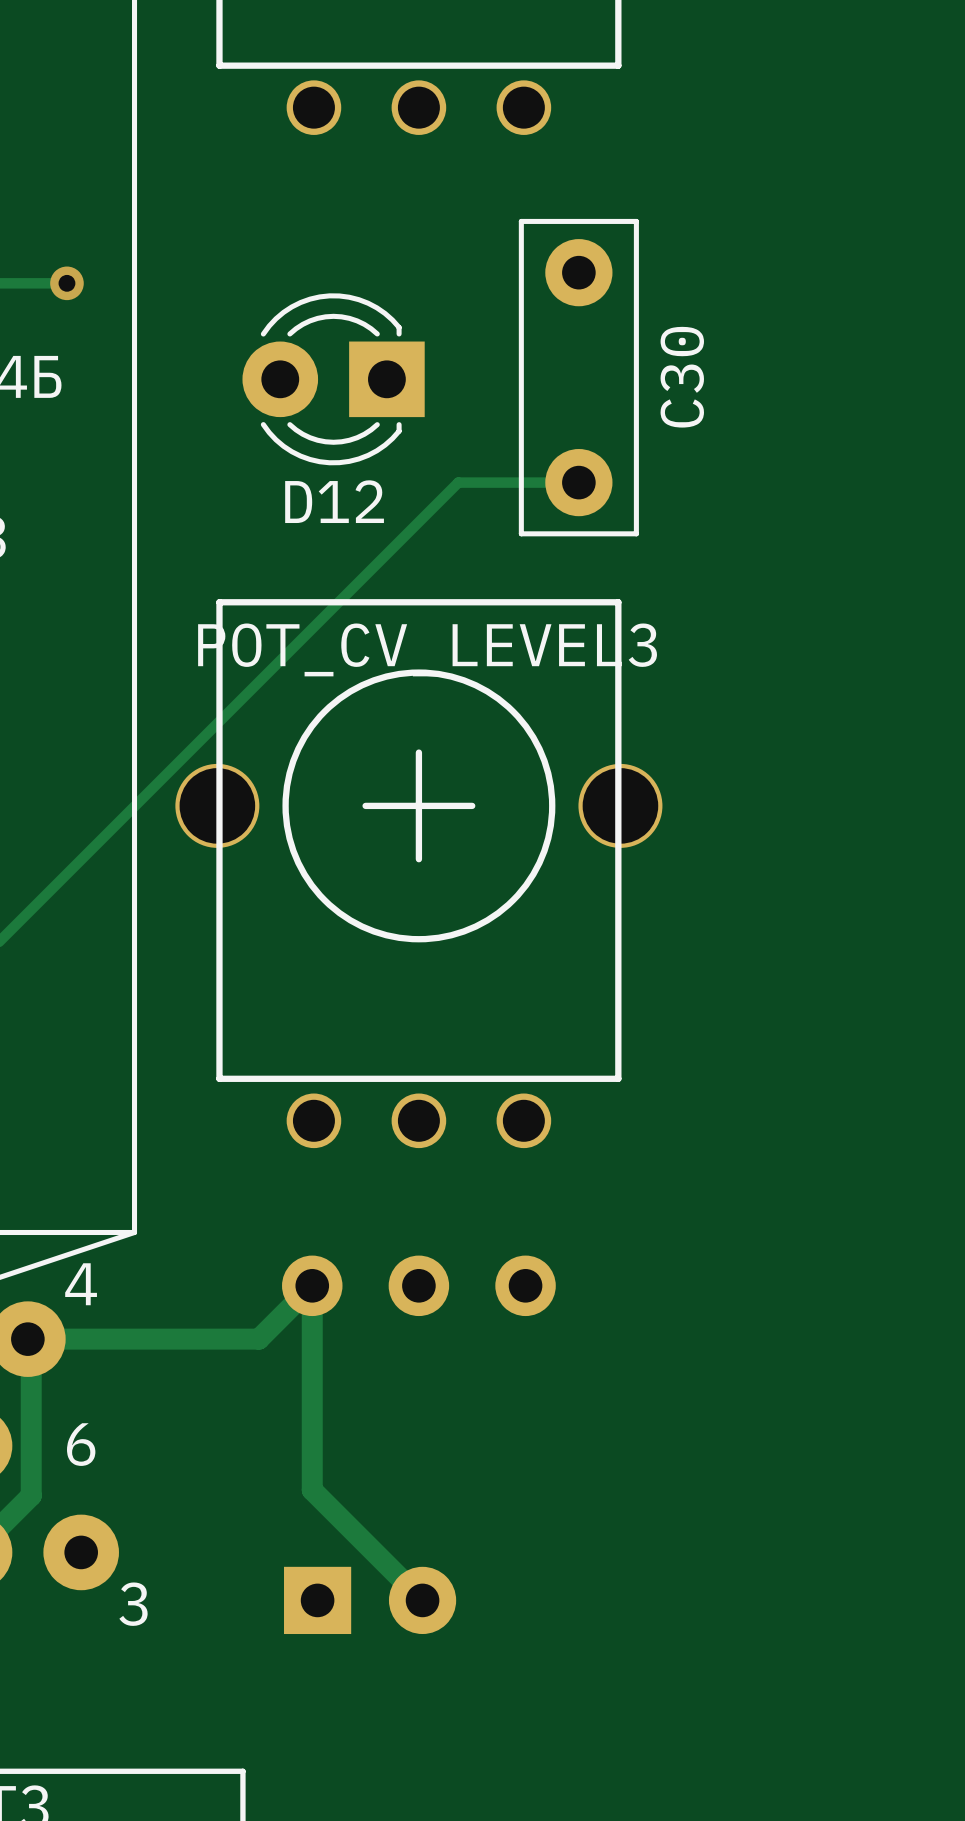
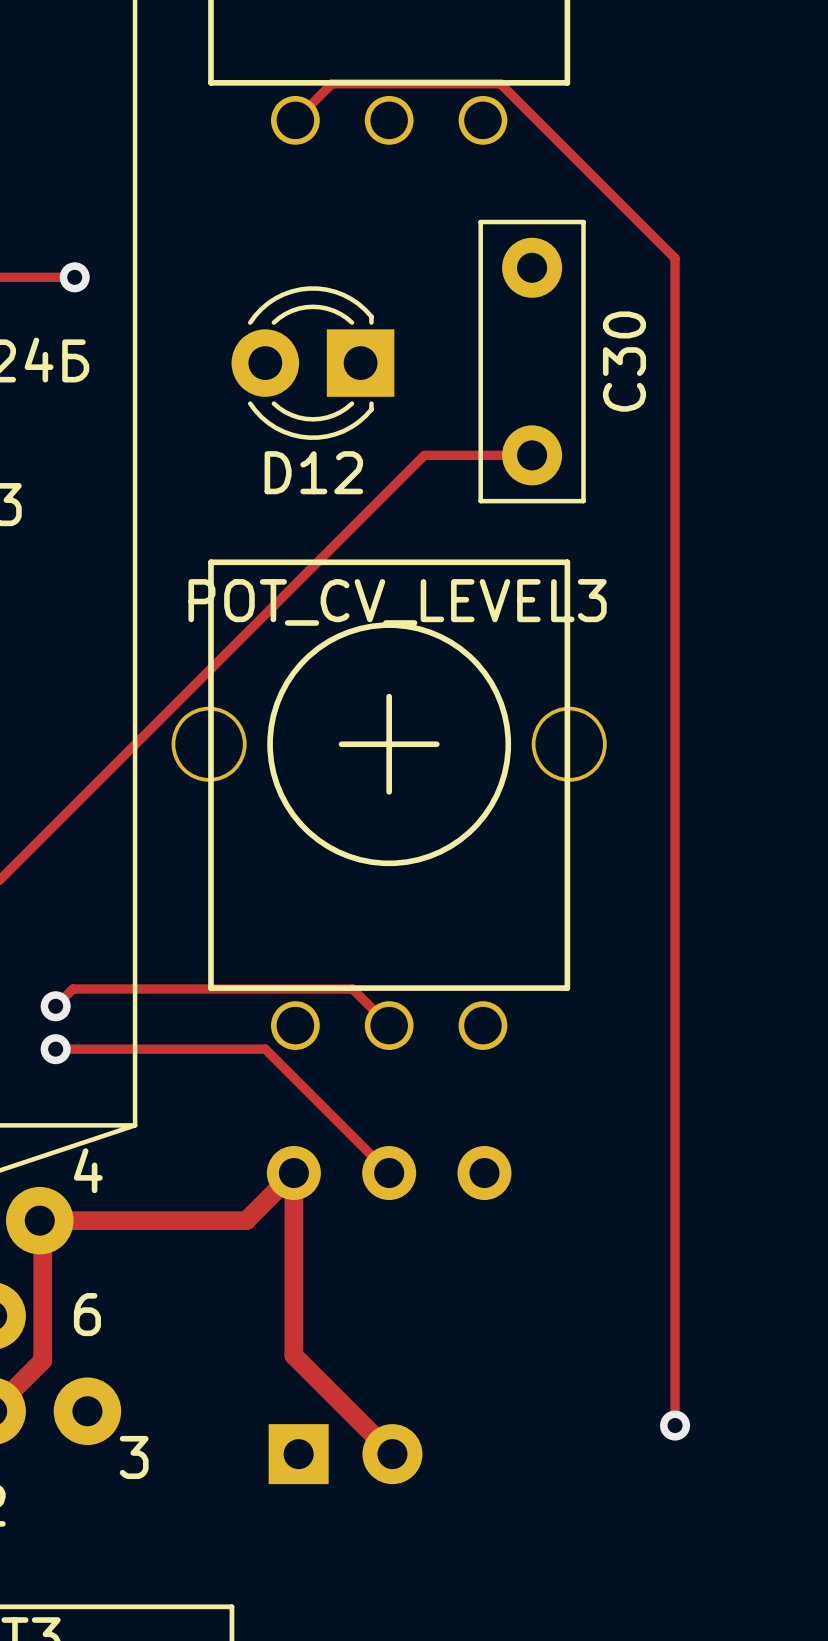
track: none -> (295, 120) (331, 83) (500, 83) (675, 258) (675, 1425)
track: none -> (55, 1006) (72, 989) (352, 989) (389, 1025)
via: none -> (55, 1006)
track: none -> (55, 1049) (265, 1049) (389, 1173)
via: none -> (55, 1049)
via: none -> (675, 1425)

